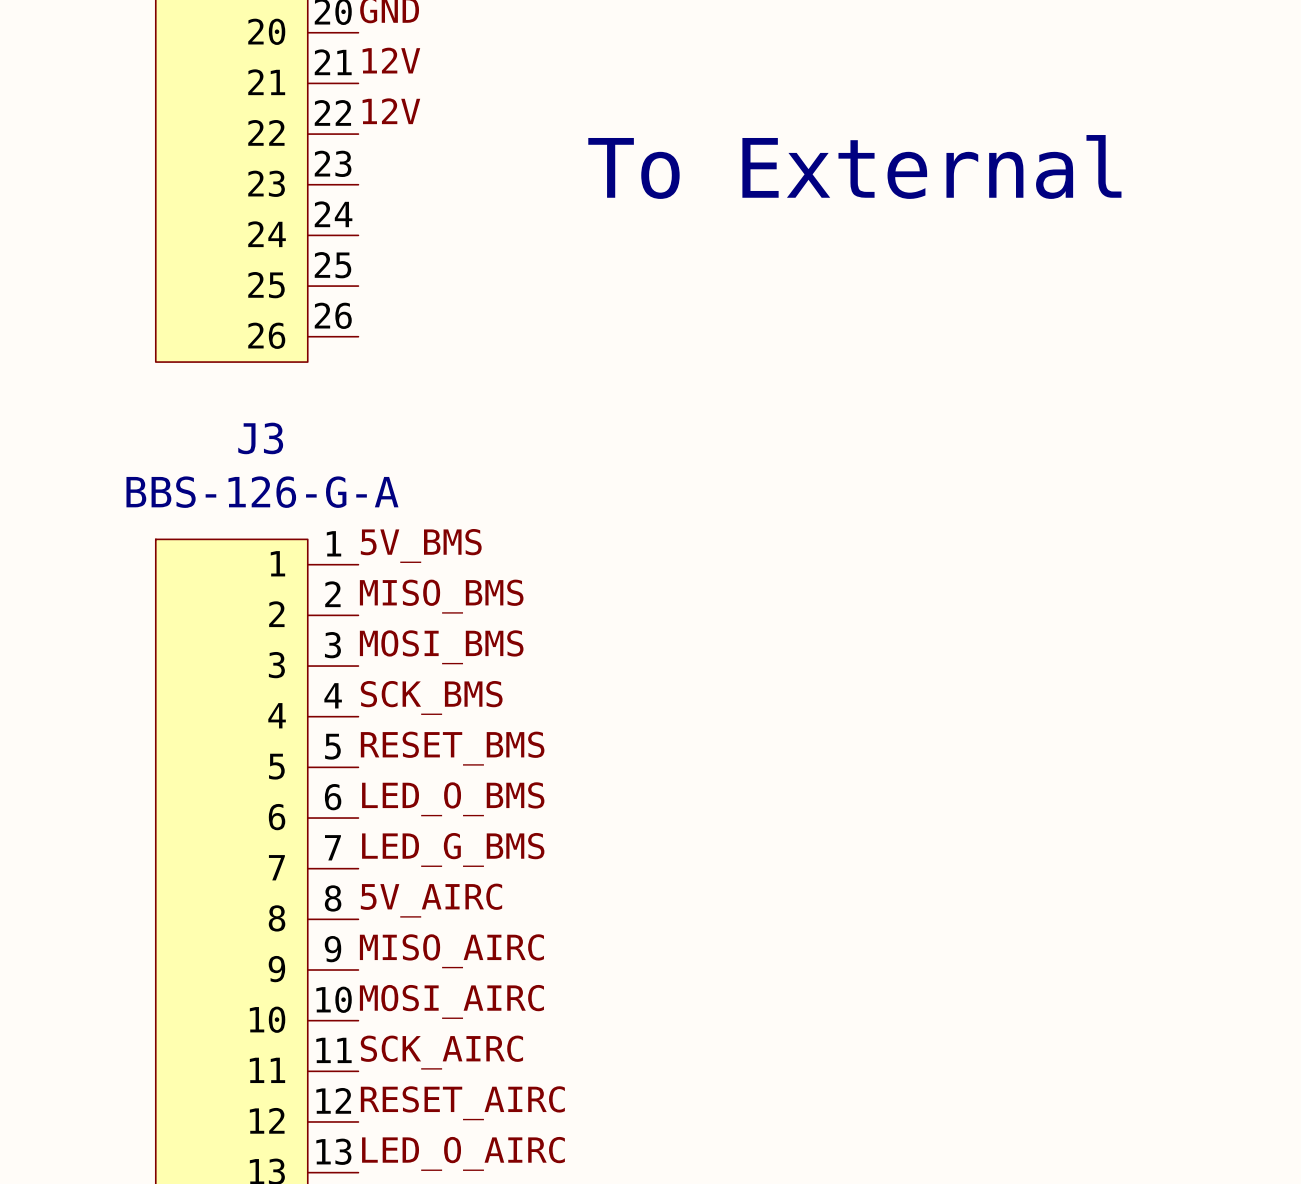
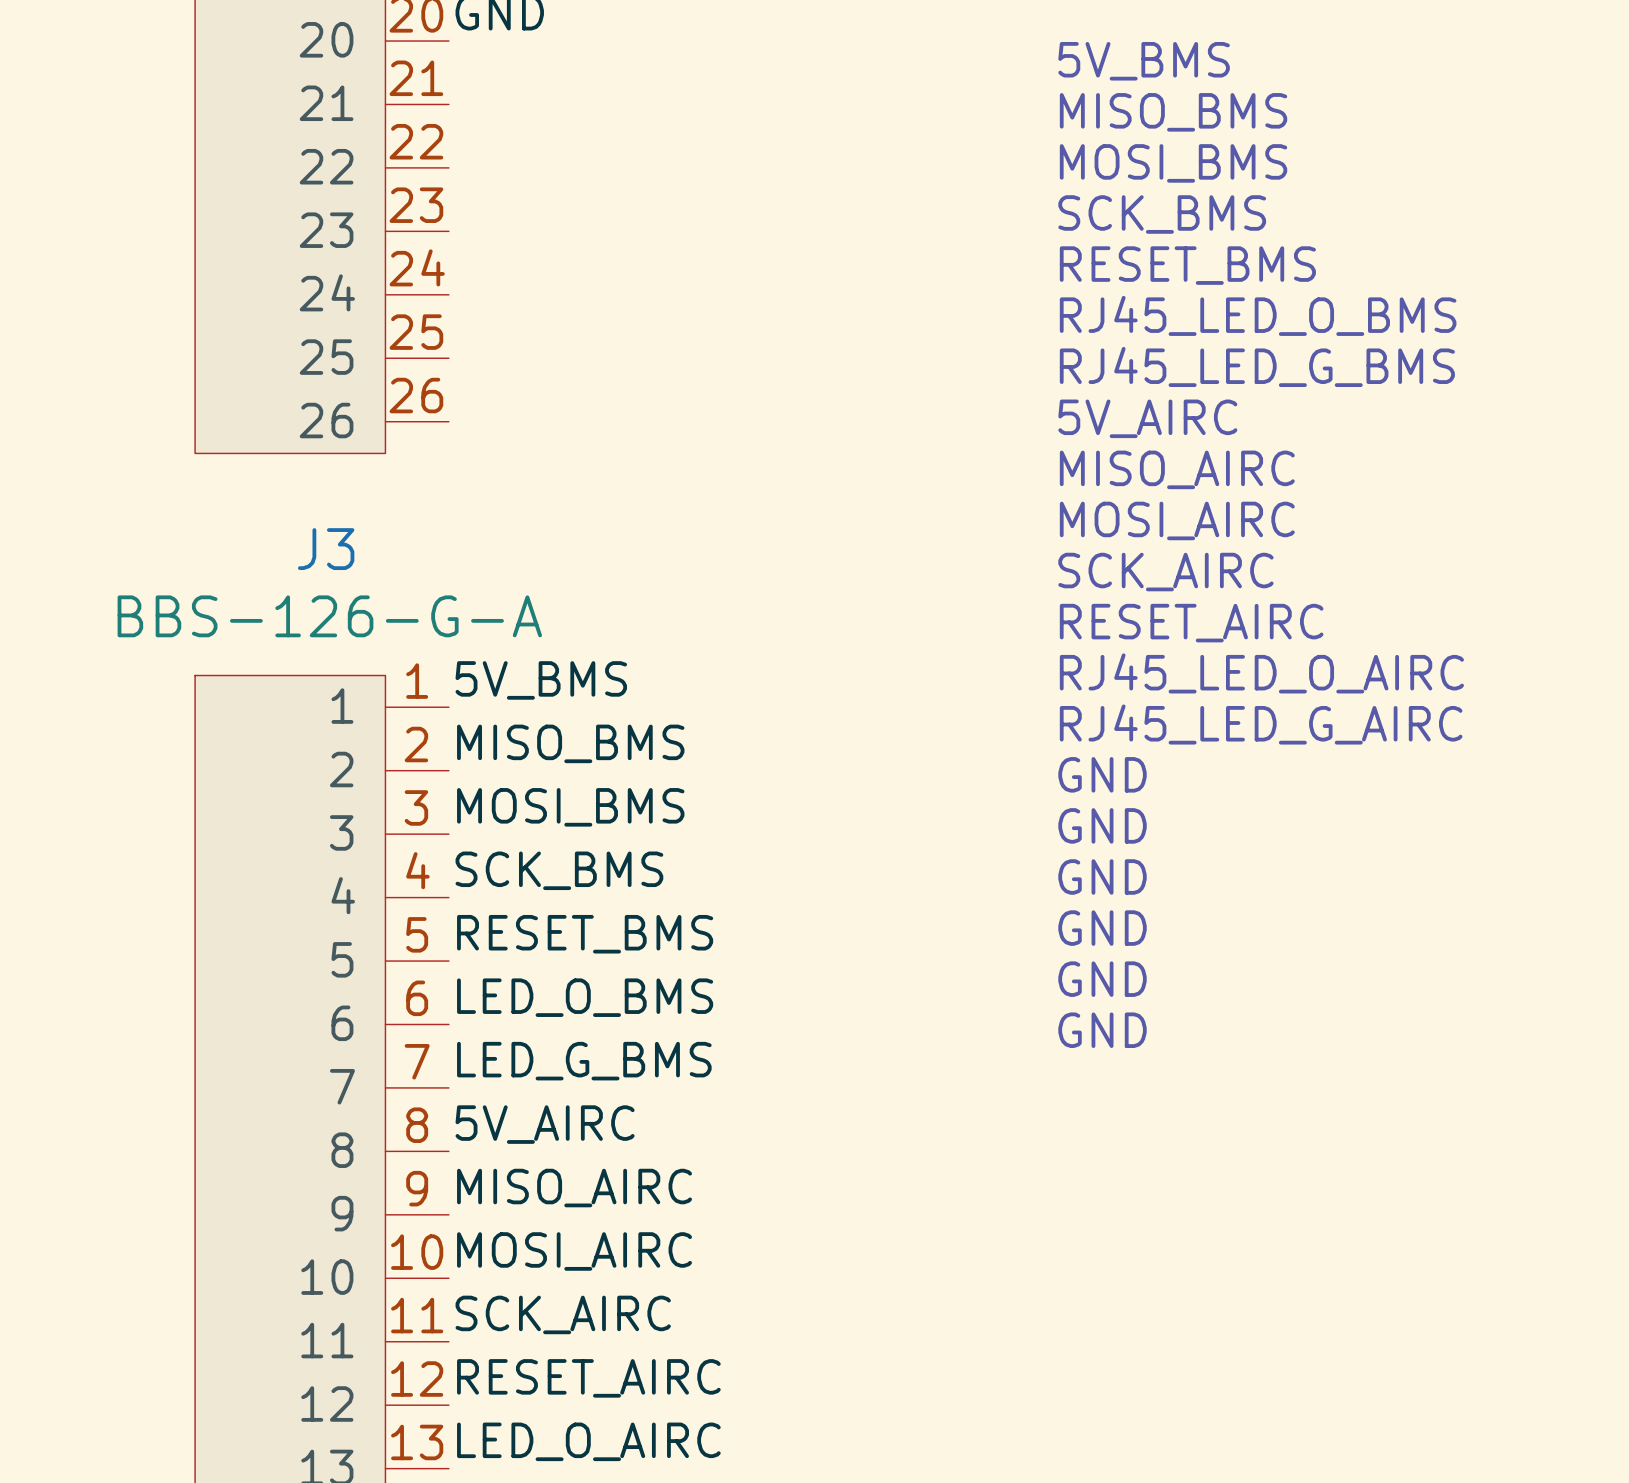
text: none -> 5V_BMS (1144, 61)
label: 12V (391, 60) -> none
text: none -> MISO_BMS (1173, 112)
label: 12V (391, 111) -> none
text: none -> MOSI_BMS (1173, 163)
text: To External (854, 166) -> none
text: none -> SCK_BMS (1162, 214)
text: none -> RESET_BMS (1187, 265)
text: none -> RJ45_LED_O_BMS (1258, 315)
text: none -> RJ45_LED_G_BMS (1257, 366)
text: none -> 5V_AIRC (1147, 418)
text: none -> MISO_AIRC (1177, 469)
text: none -> MOSI_AIRC (1177, 520)
text: none -> SCK_AIRC (1165, 572)
text: none -> RESET_AIRC (1191, 623)
text: none -> RJ45_LED_O_AIRC (1261, 673)
text: none -> RJ45_LED_G_AIRC (1261, 724)
text: none -> GND (1102, 774)
text: none -> GND (1102, 825)
text: none -> GND (1102, 876)
text: none -> GND (1102, 928)
text: none -> GND (1102, 979)
text: none -> GND (1102, 1030)

